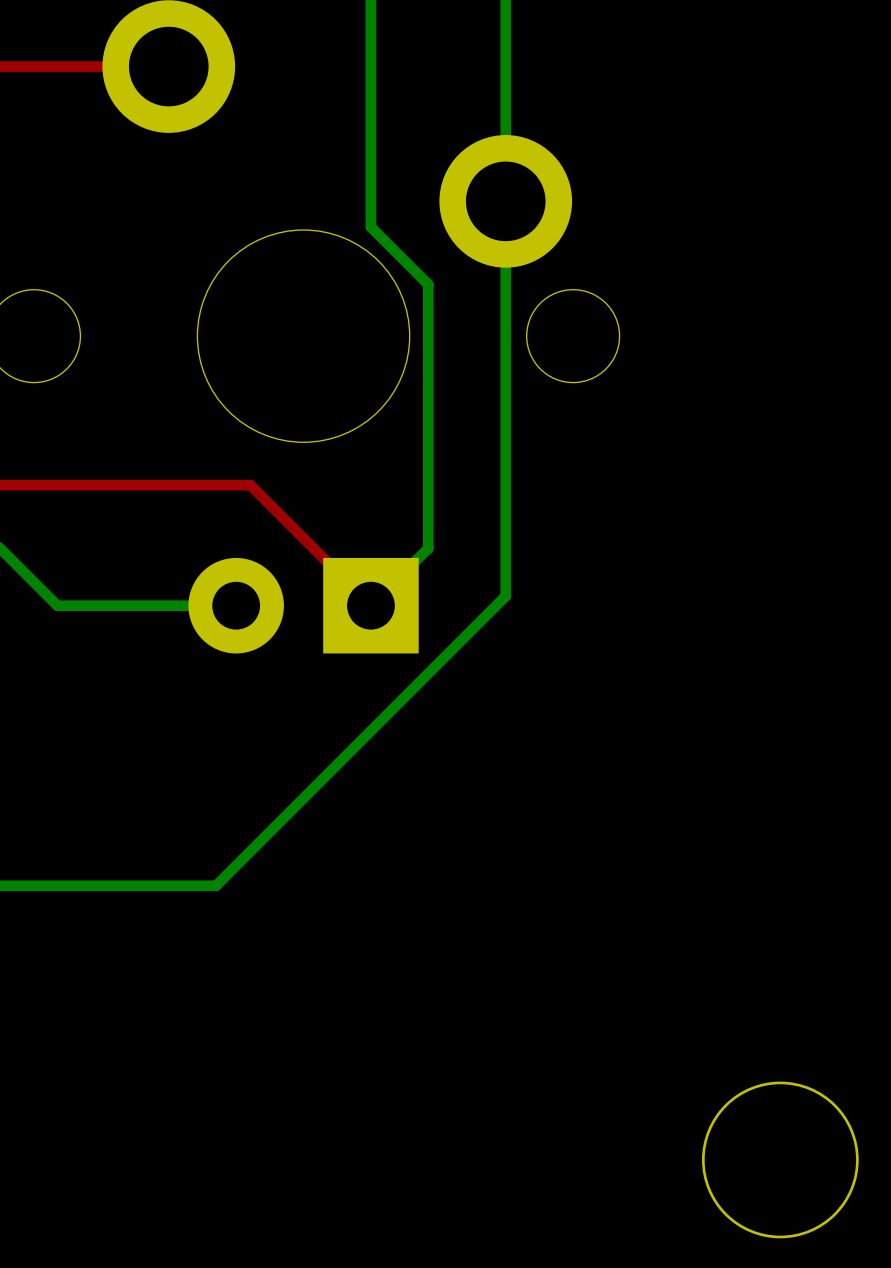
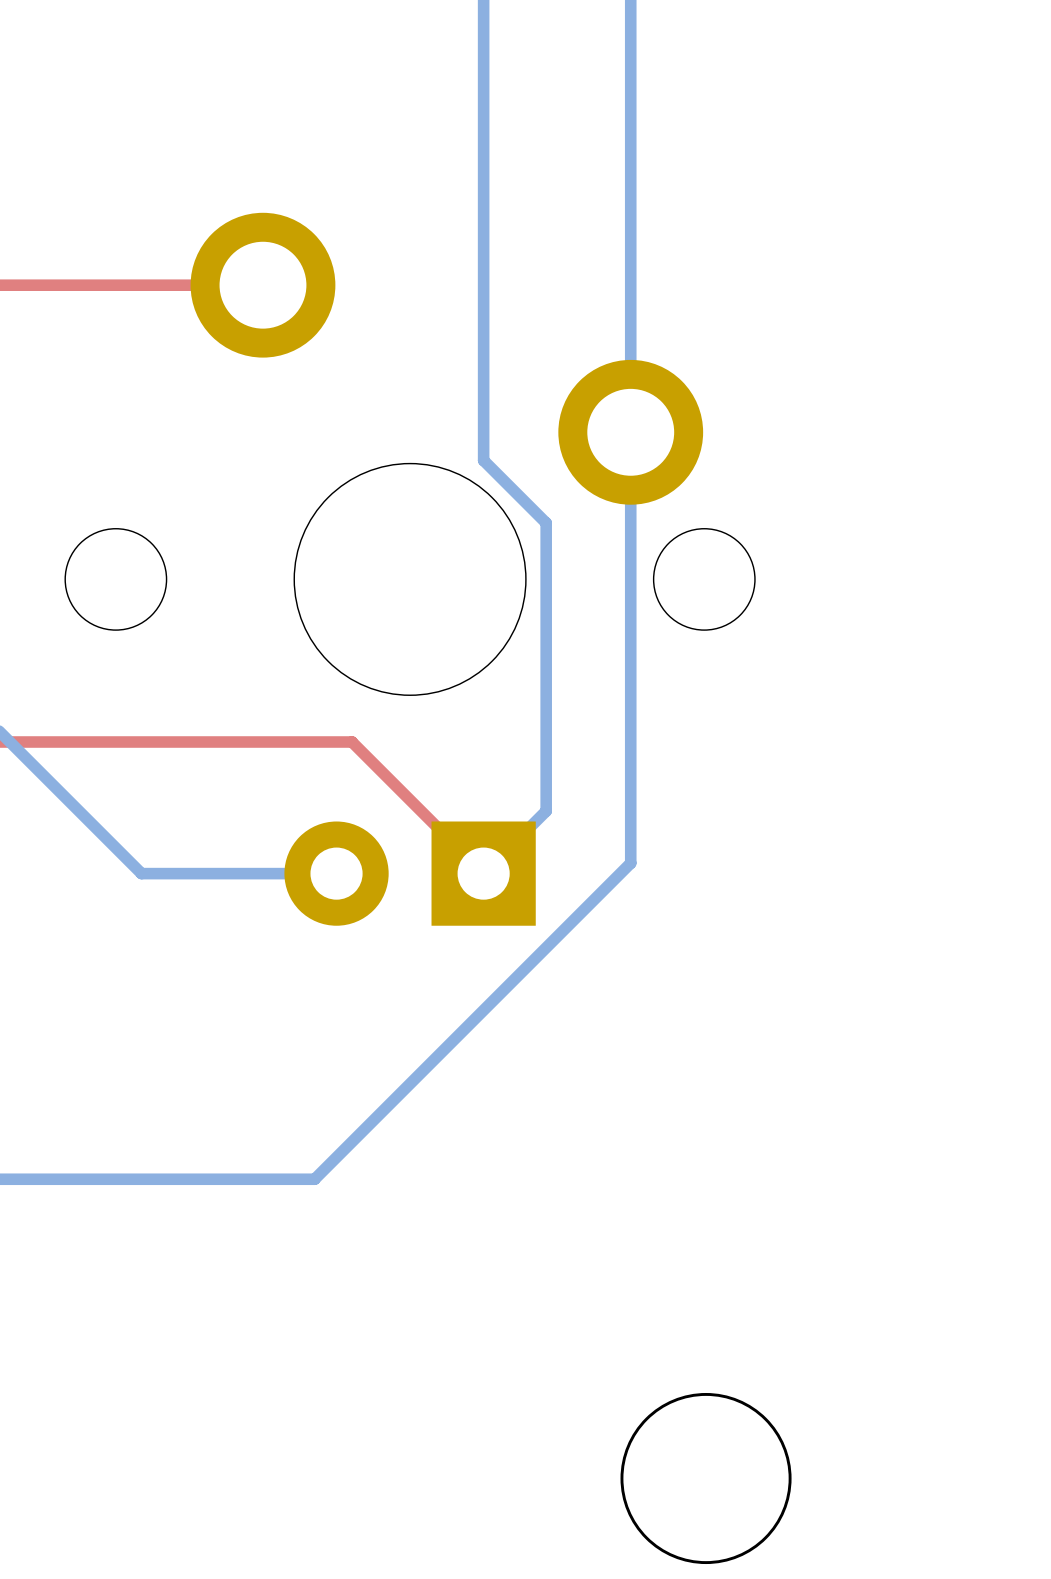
round board edge position: (780, 1159) -> (706, 1478)

